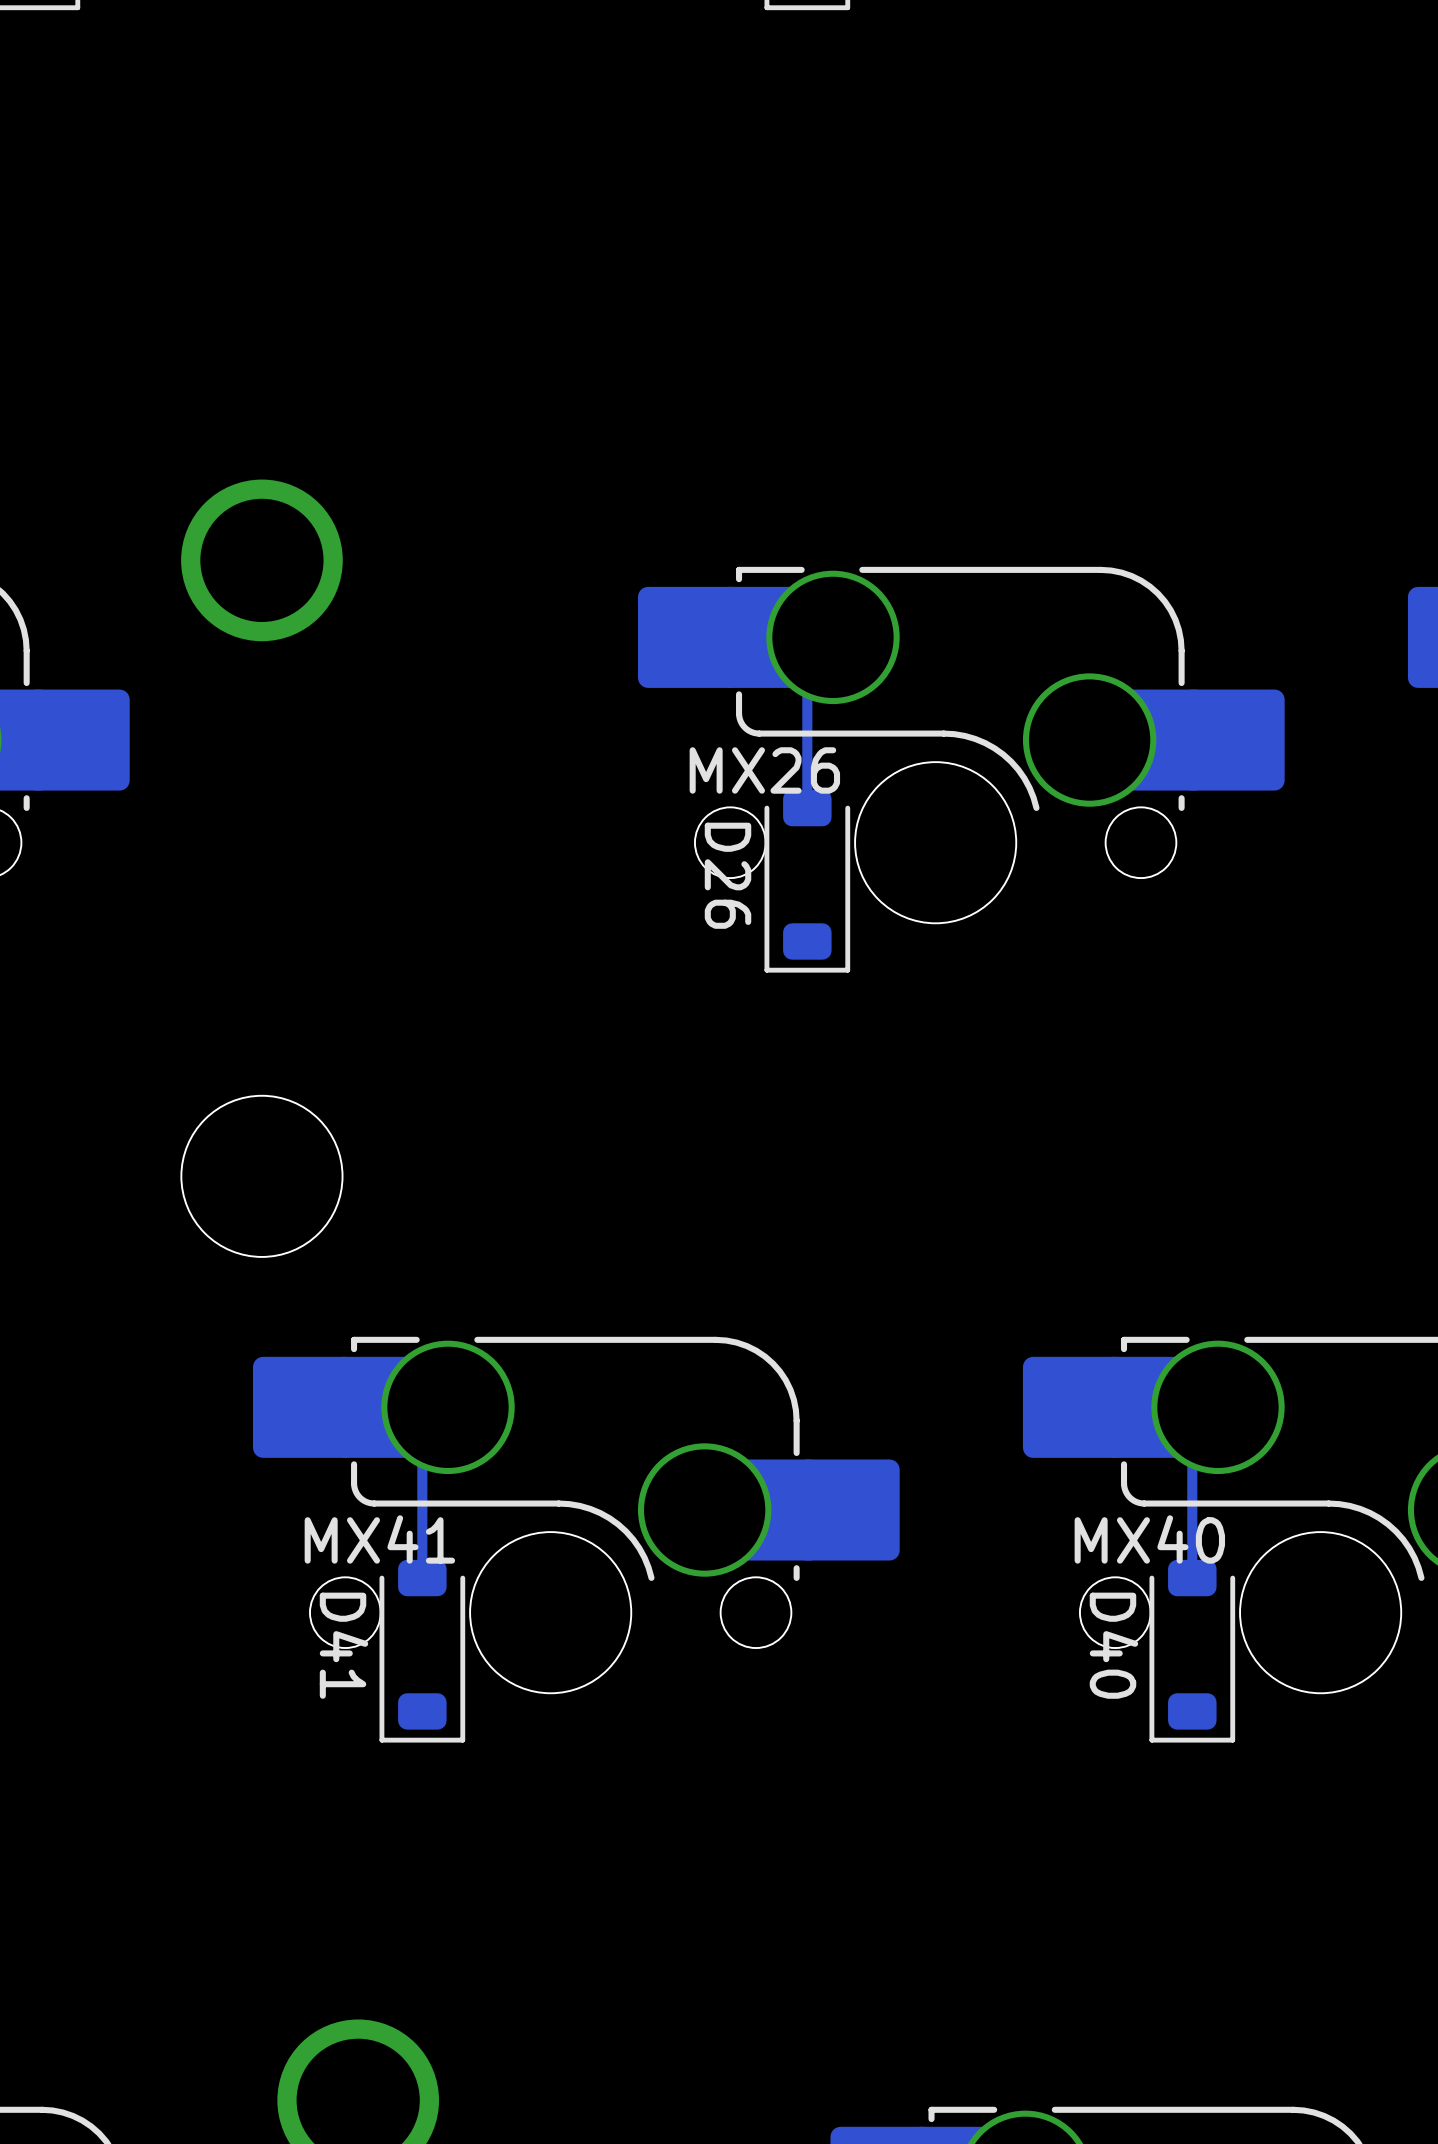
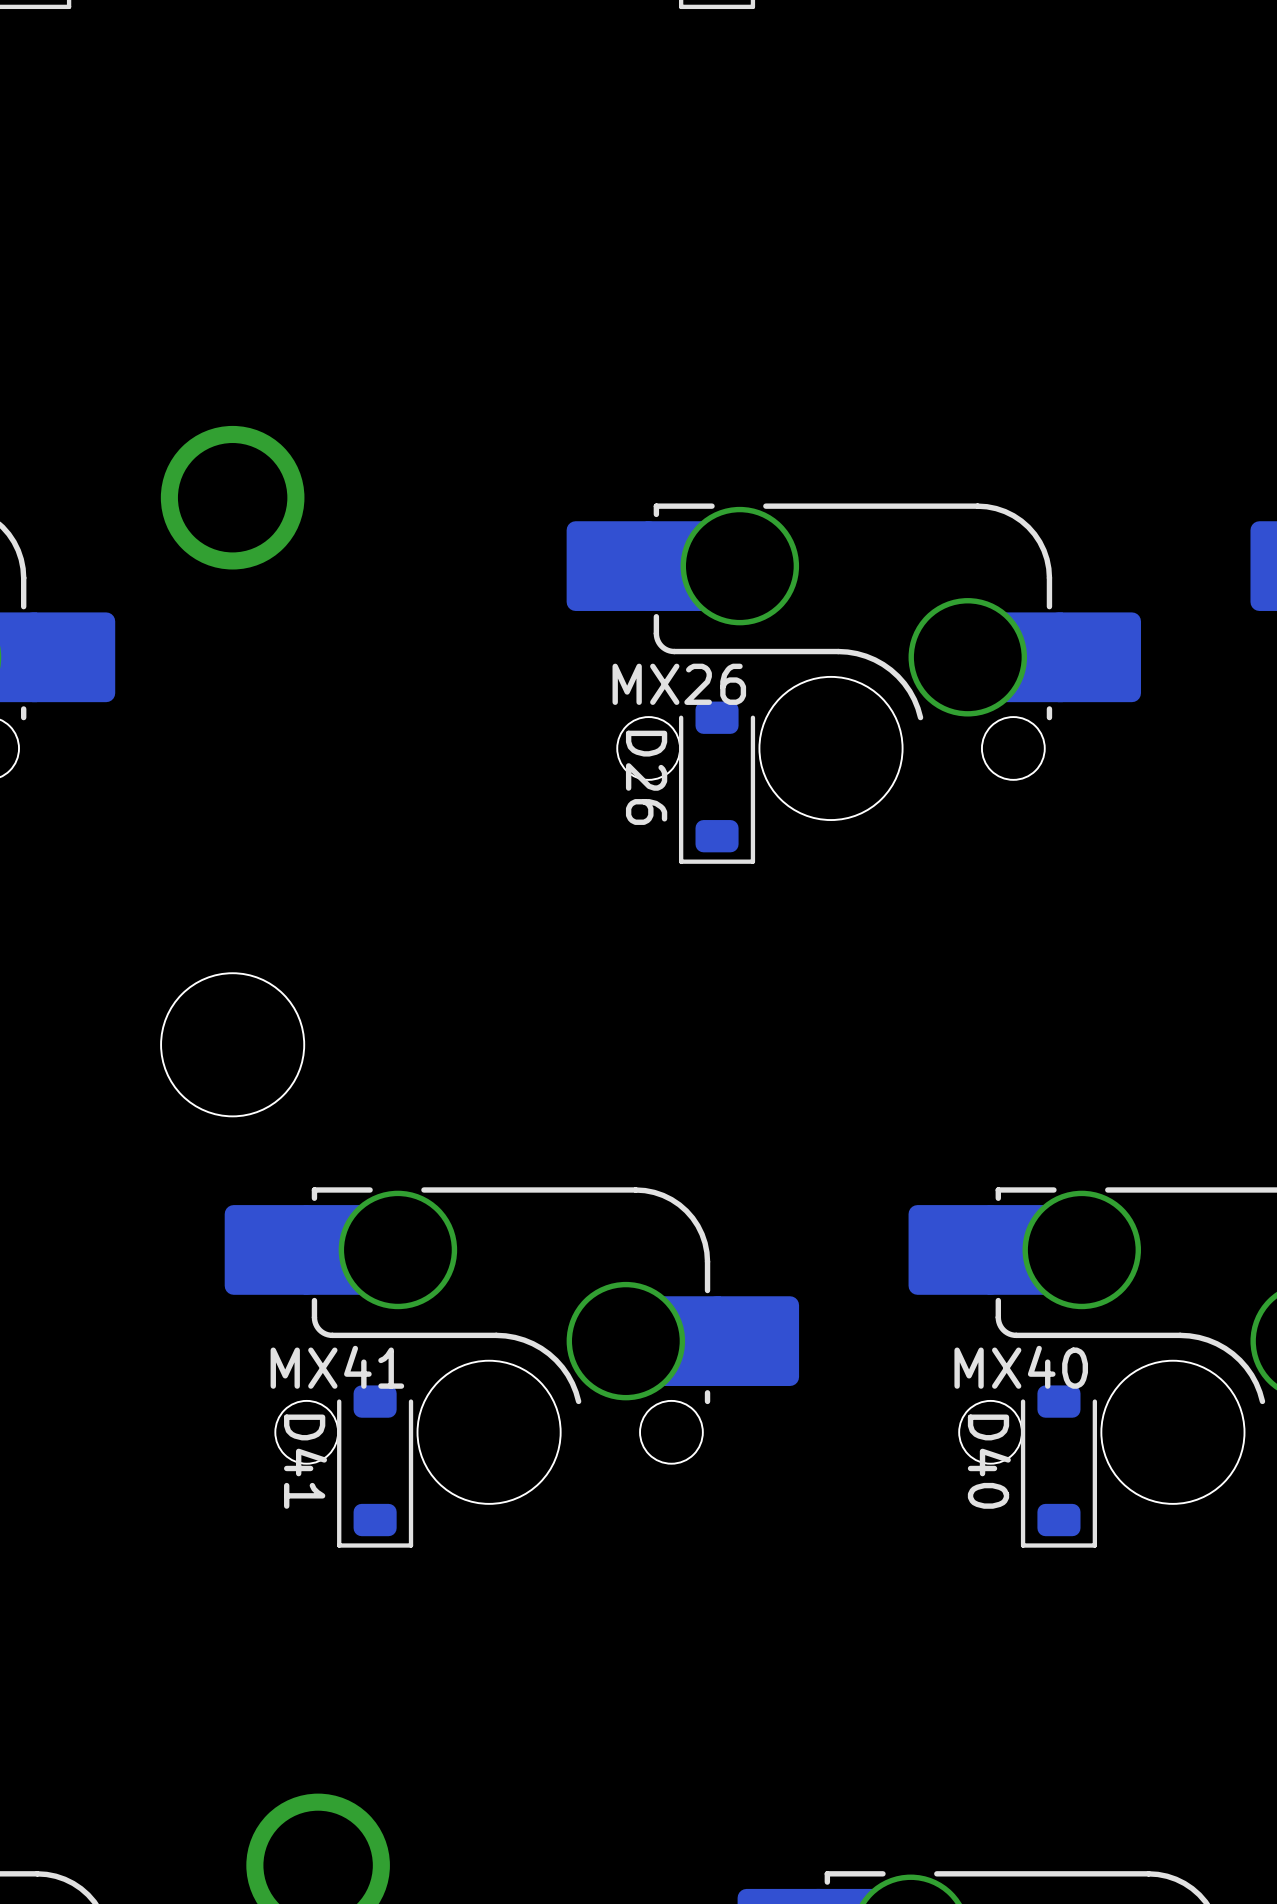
bottom track: (832, 637) (807, 663) (807, 808) -> none
bottom track: (448, 1407) (422, 1433) (422, 1578) -> none
bottom track: (1217, 1407) (1192, 1433) (1192, 1578) -> none

